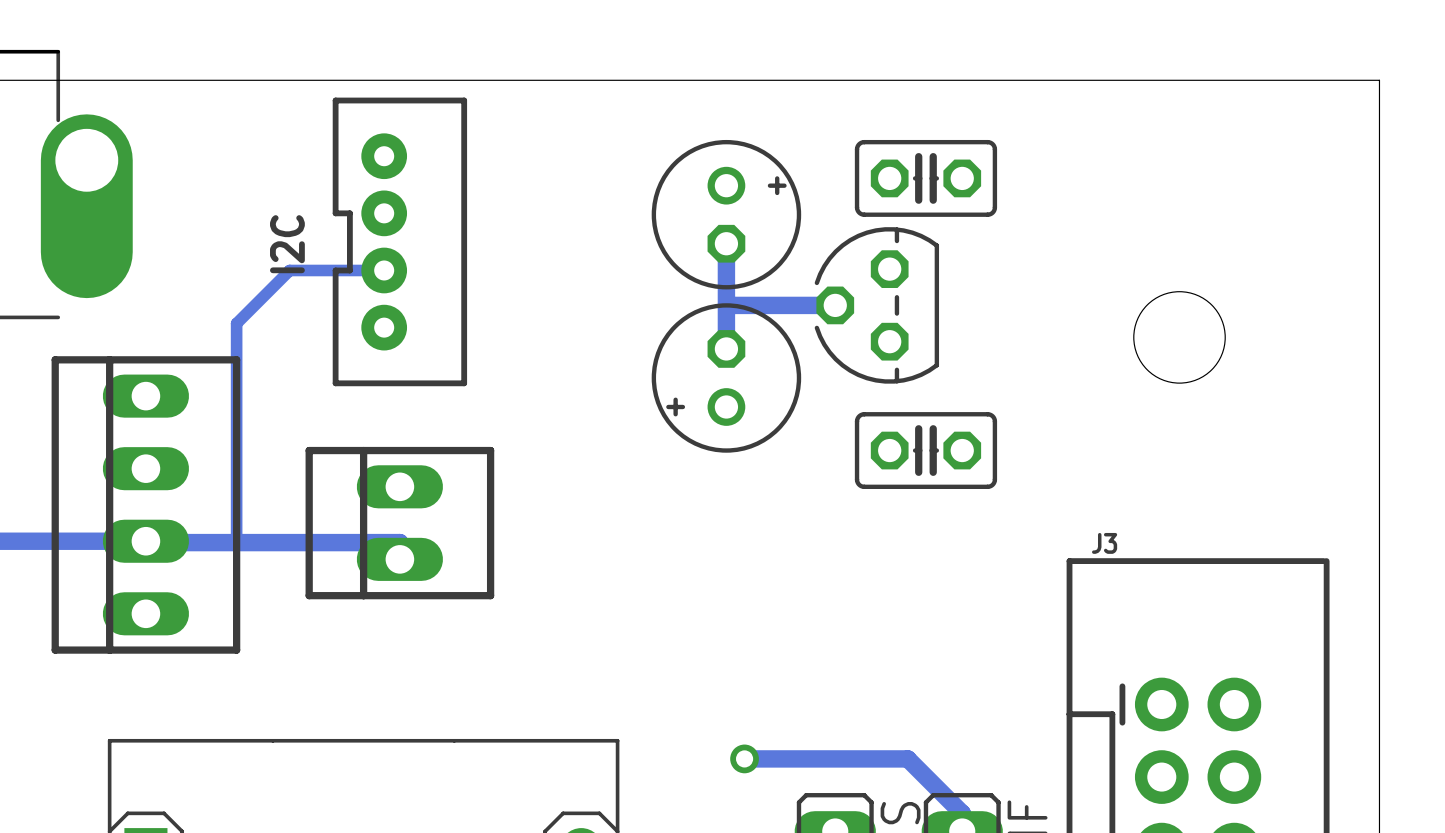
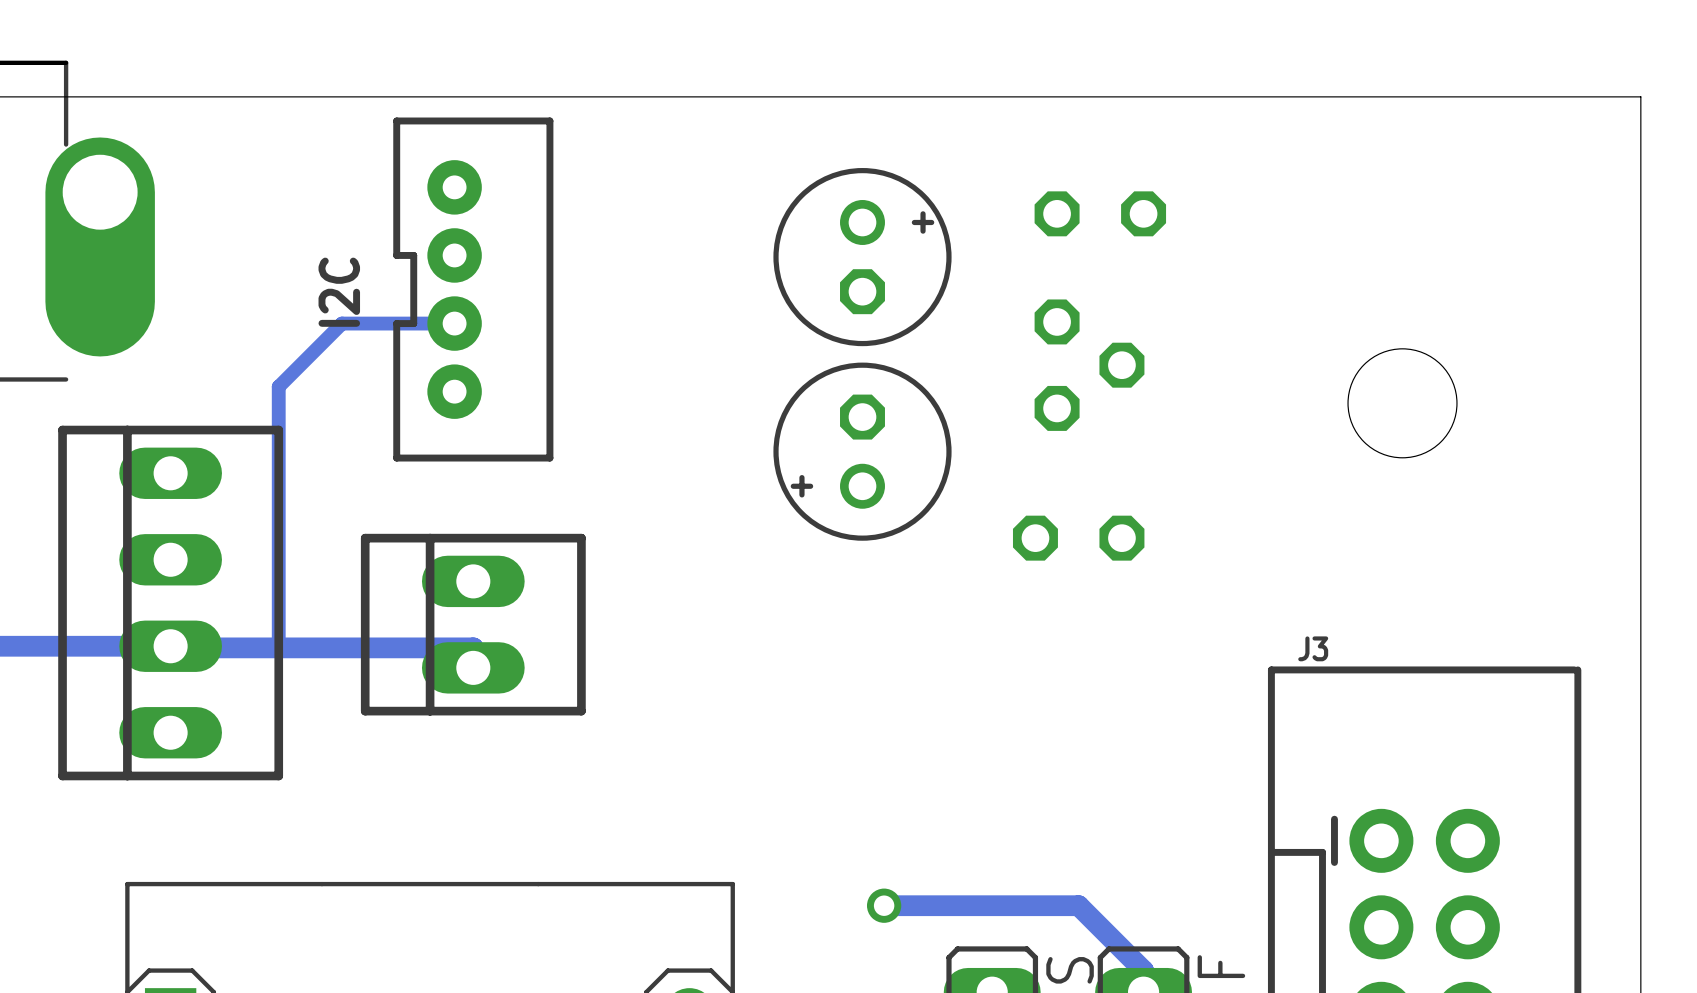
part side: bottom (925, 178) -> top (1100, 213)
track: (726, 243) (726, 348) -> none
track: (835, 305) (726, 305) -> none
part side: bottom (876, 305) -> top (1089, 365)
part side: bottom (925, 450) -> top (1078, 538)

